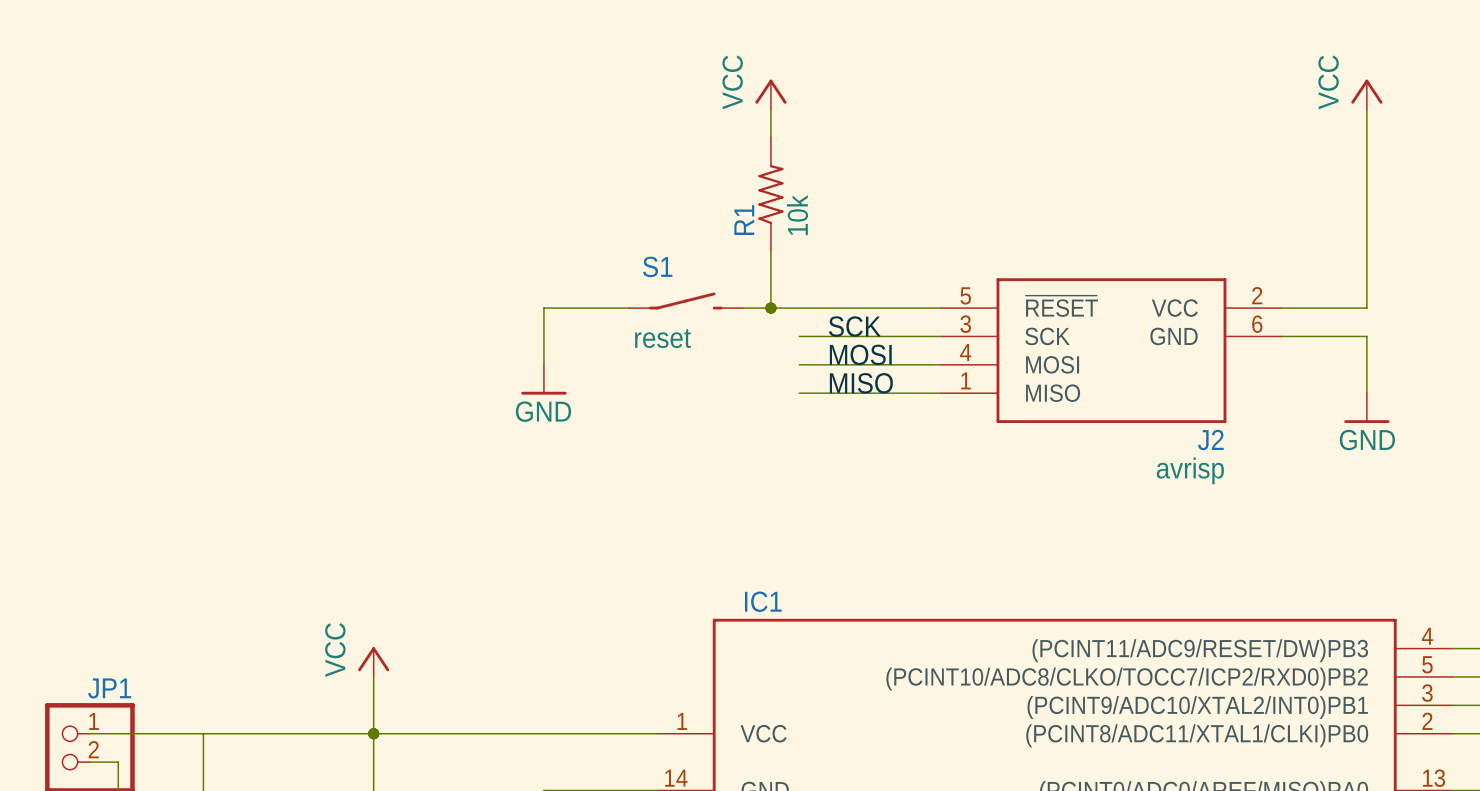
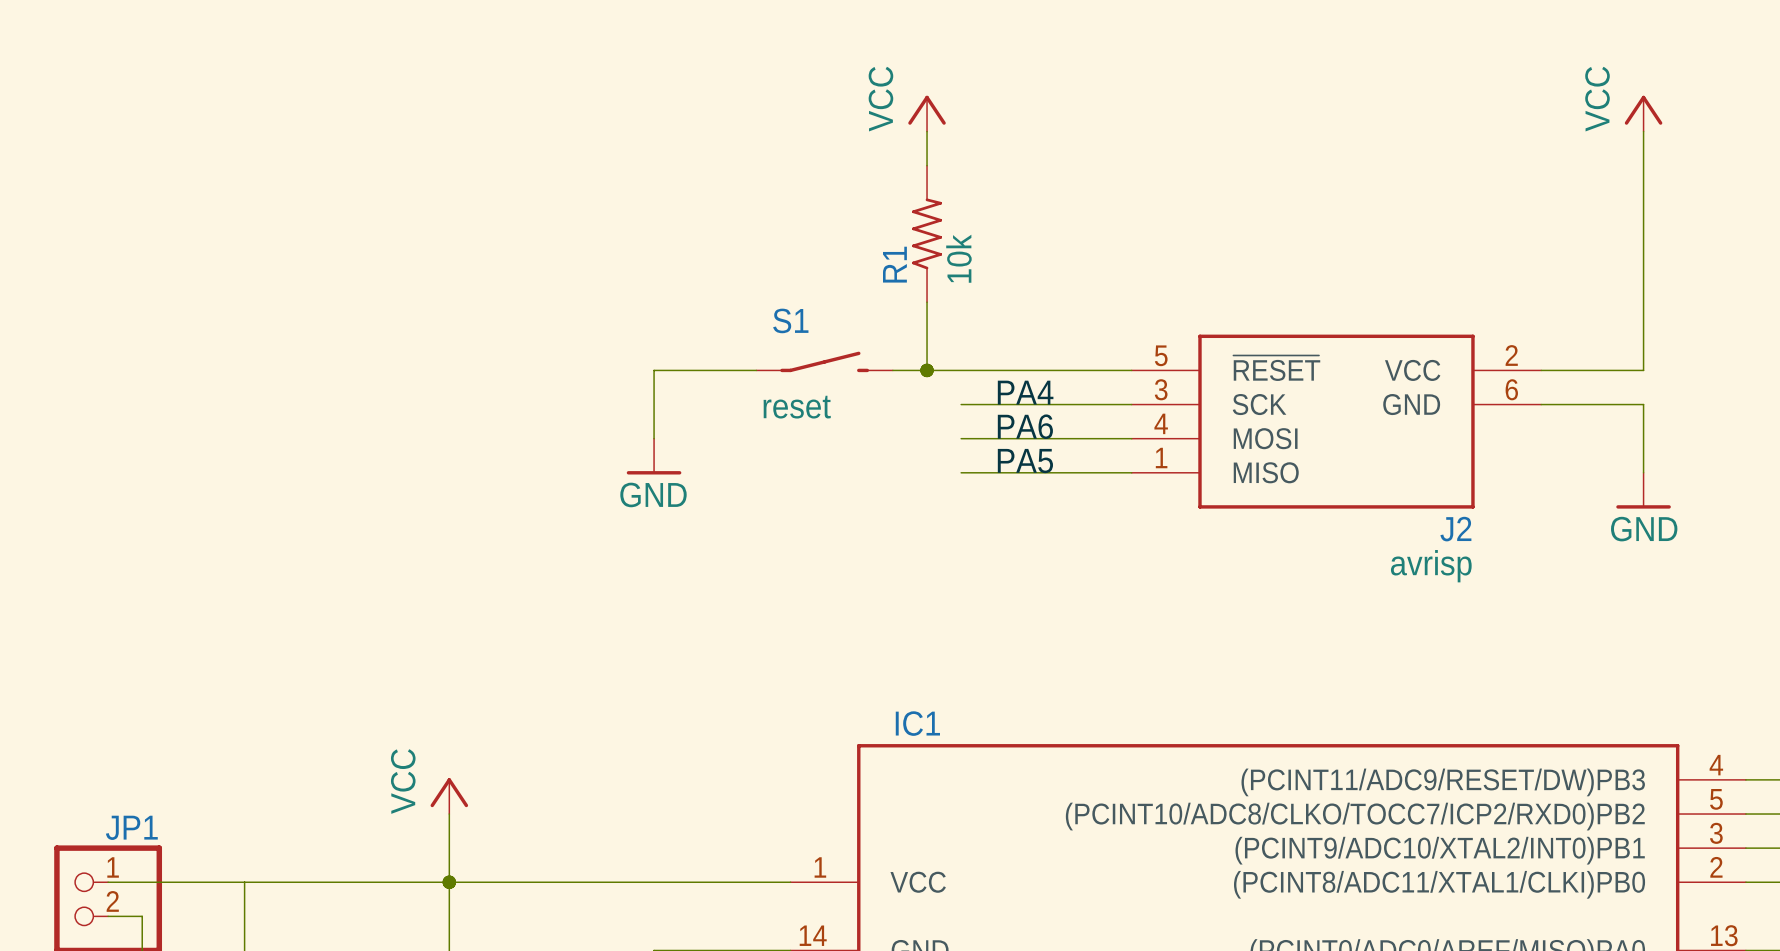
label: SCK (854, 326) -> PA4 (1025, 392)
label: MOSI (860, 354) -> PA6 (1025, 426)
label: MISO (861, 383) -> PA5 (1025, 461)

